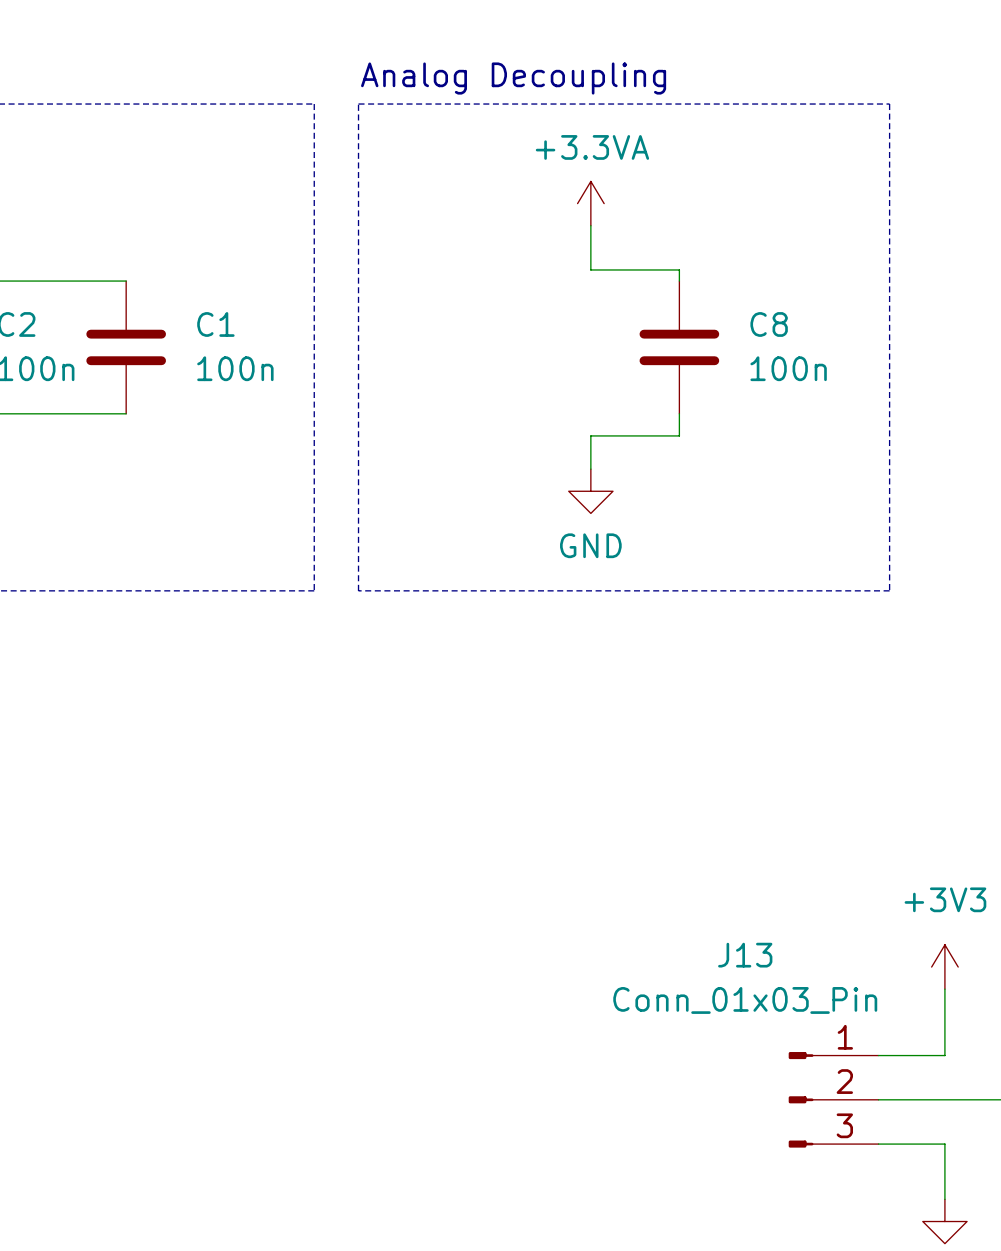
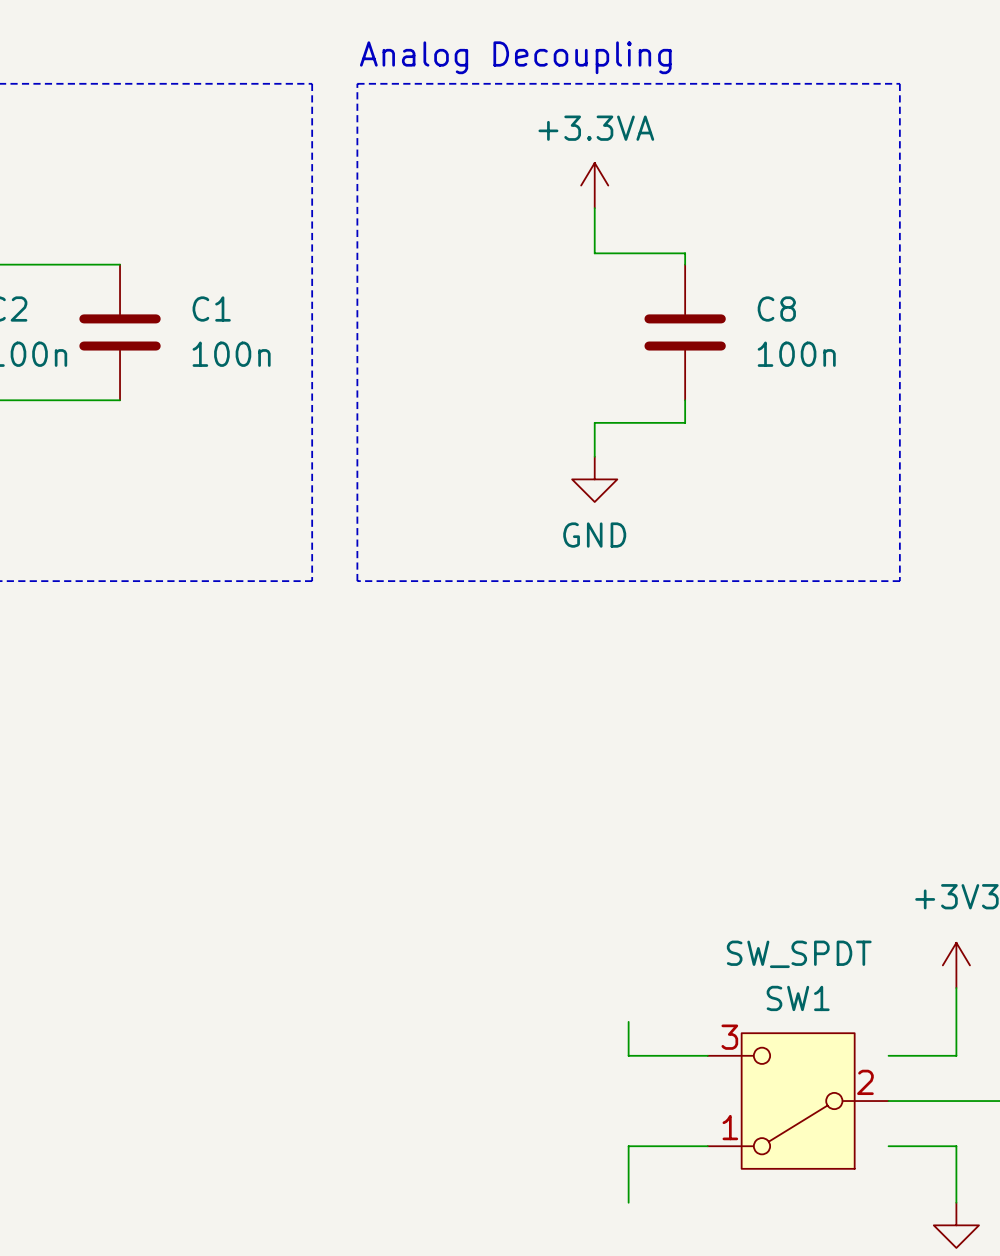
wire: none -> (628, 1021) (628, 1055) (707, 1055)
SW1: none -> SW_SPDT (798, 1101)
J13: Conn_01x03_Pin (833, 1099) -> none
wire: none -> (707, 1146) (628, 1146) (628, 1202)

